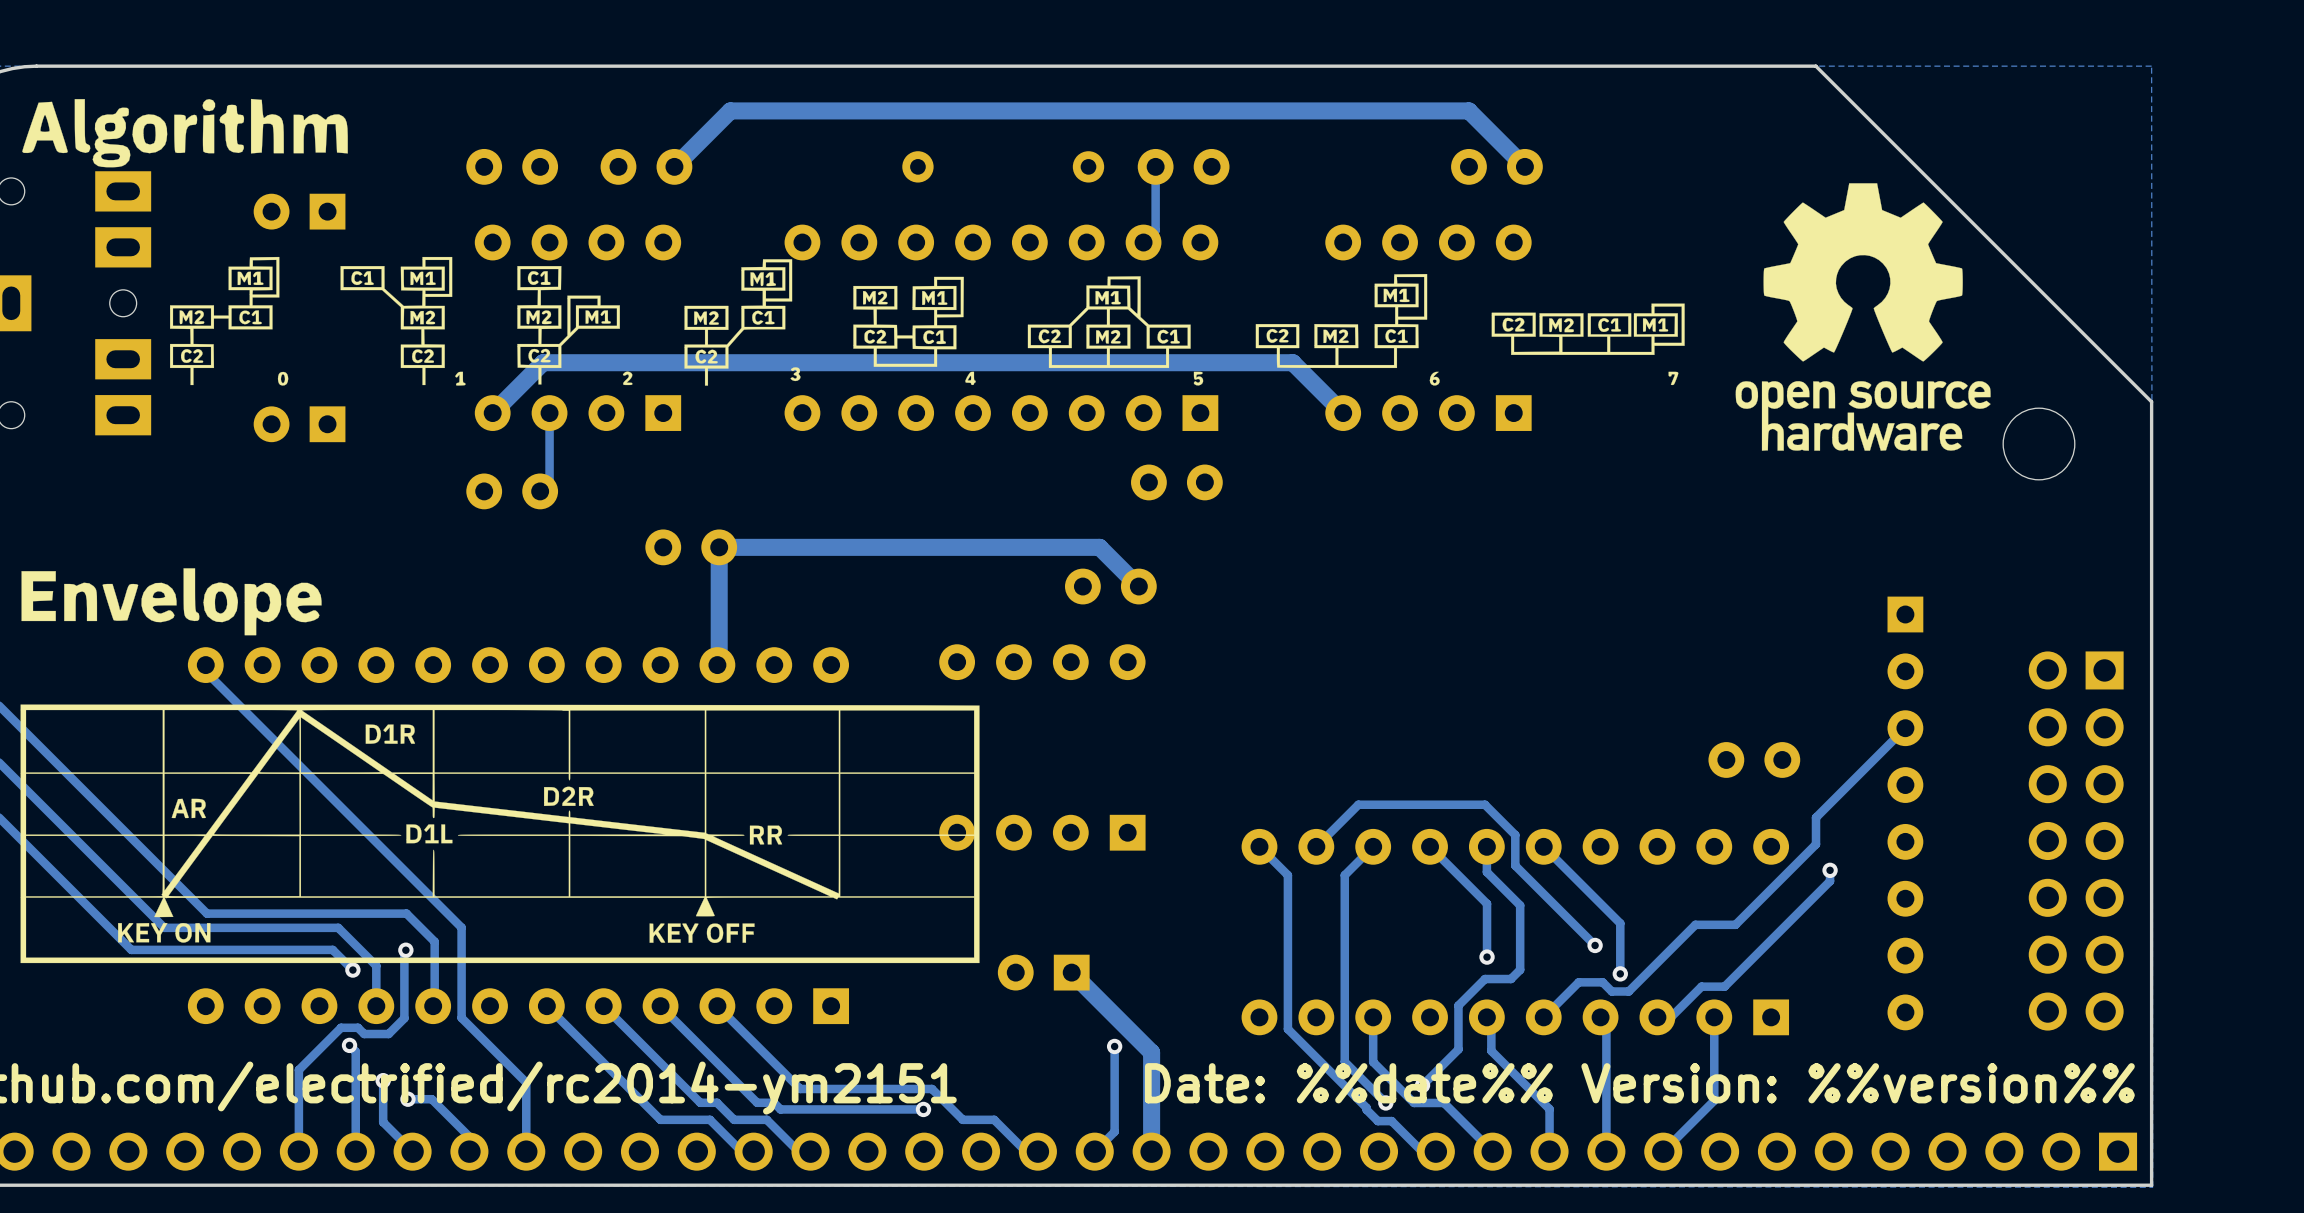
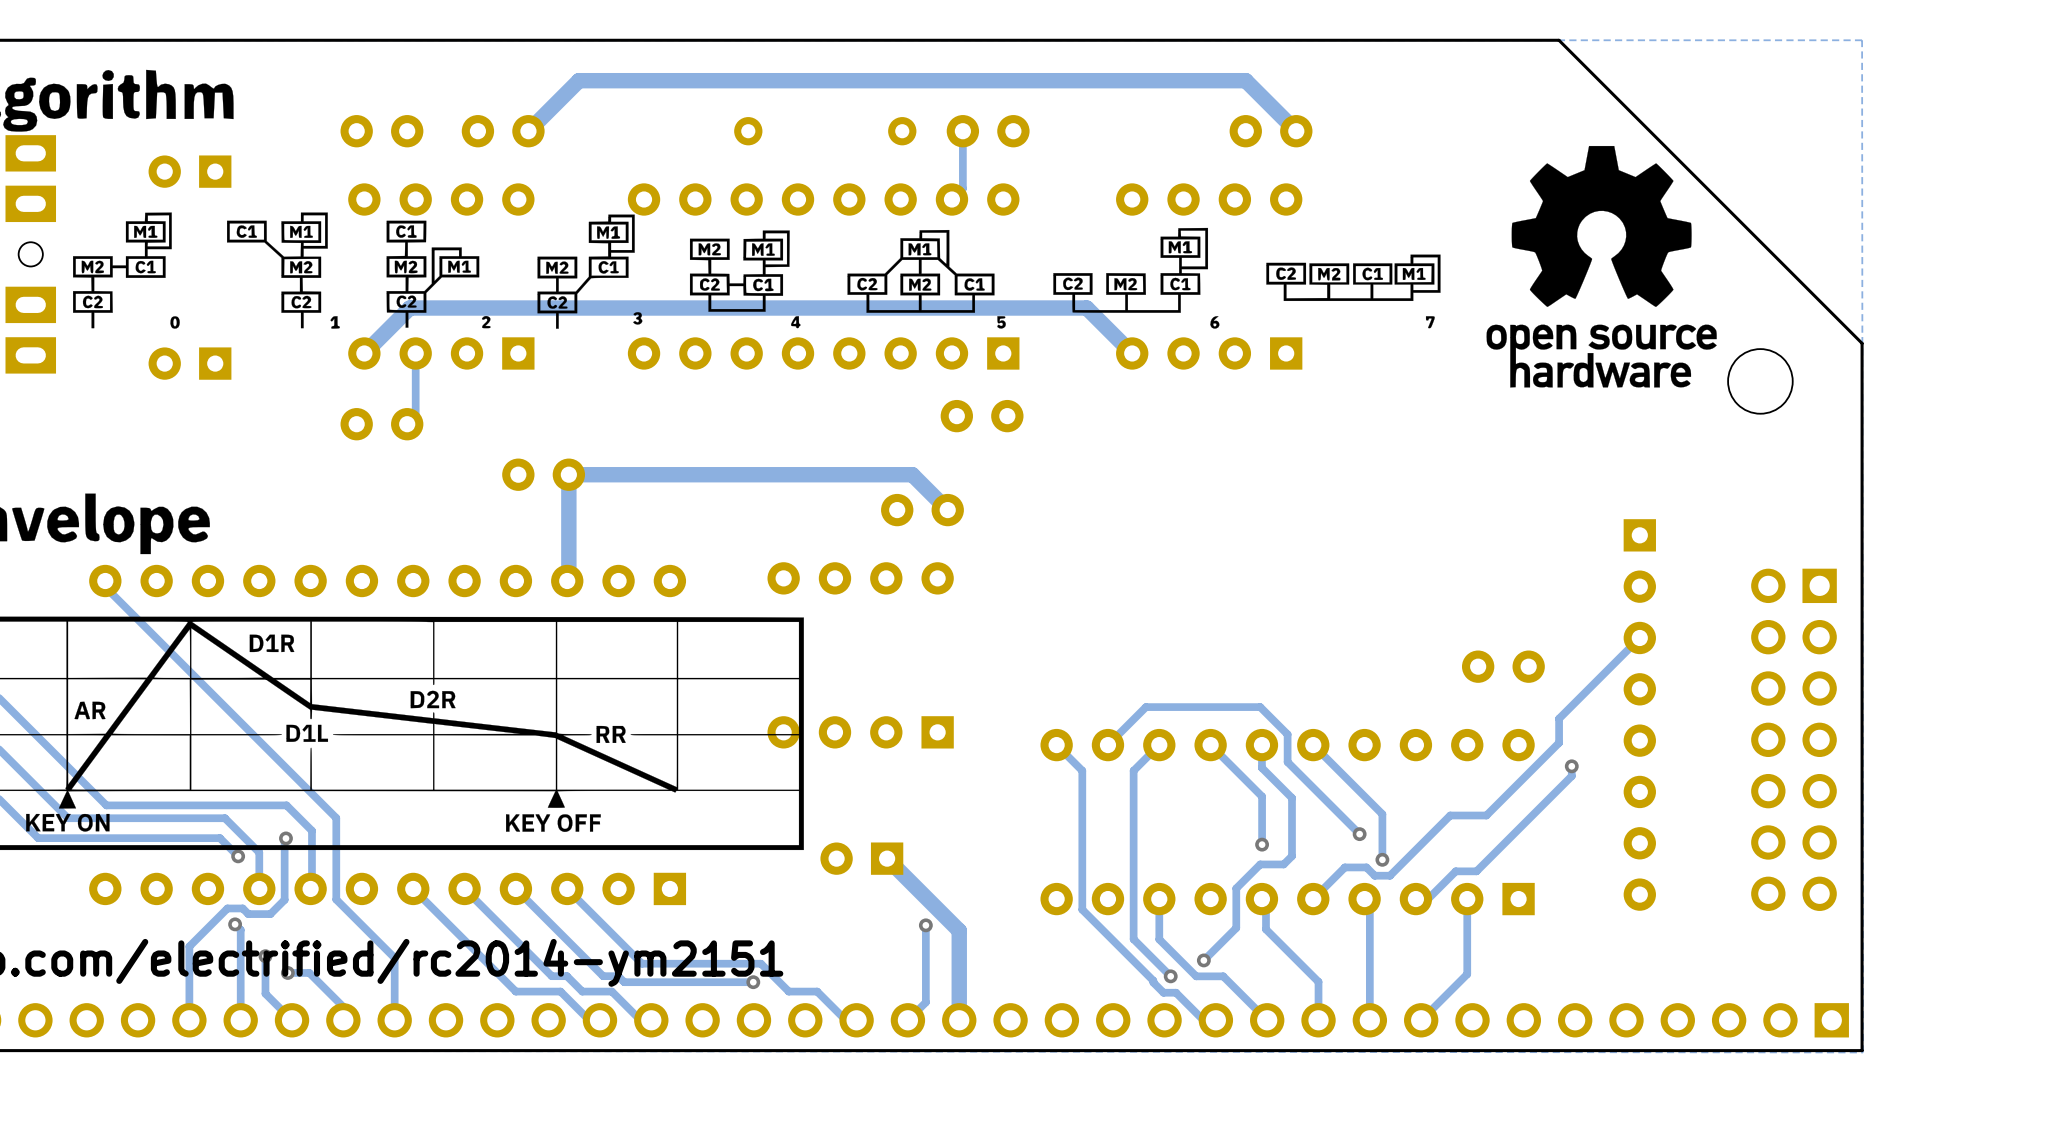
text: Date: %%date%% Version: %%version%% (1639, 1083) -> none

